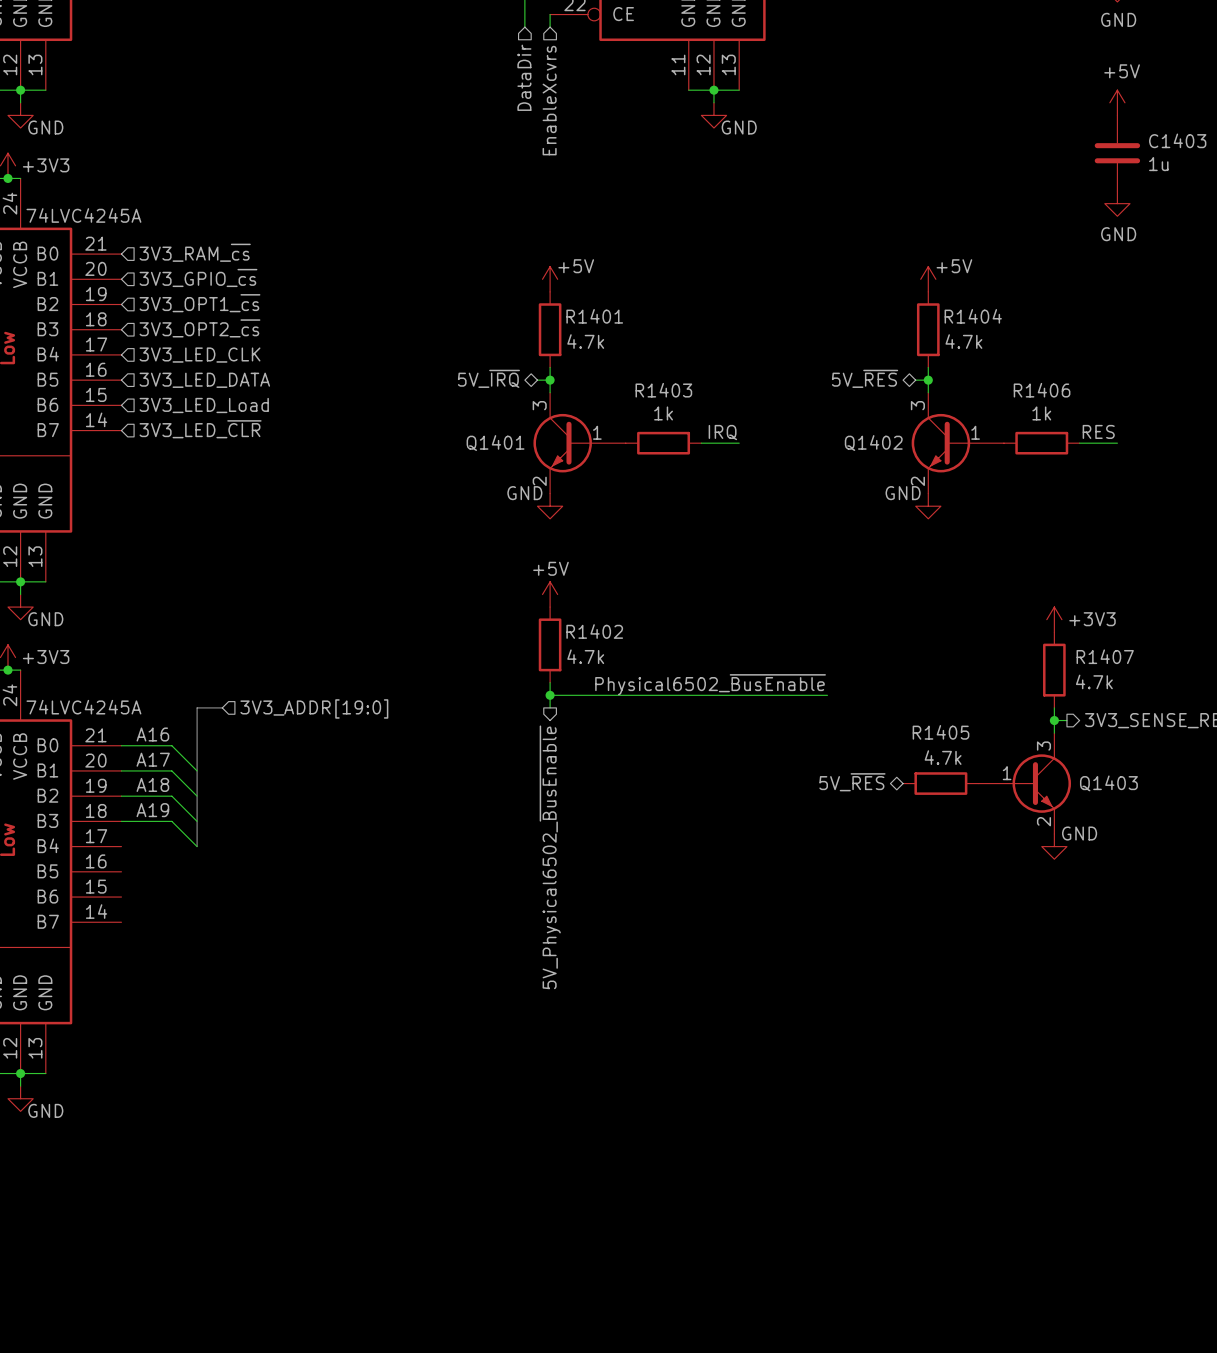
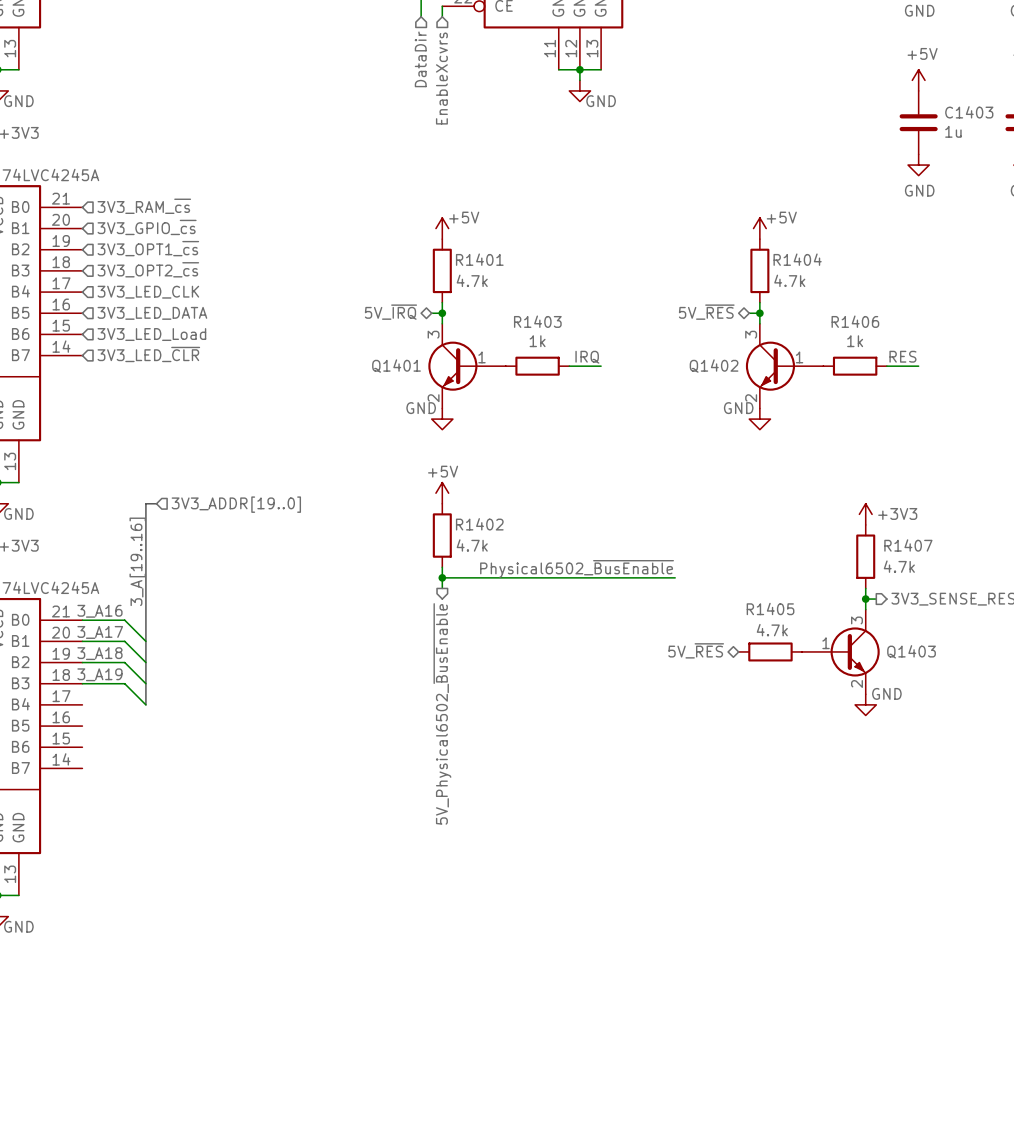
hierarchical label: none -> 3V3_ADDR[19..0] (236, 504)
label: none -> 3_A[19..16] (137, 561)
bus: (197, 707) (222, 707) -> (145, 588) (145, 503) (156, 503)
hierarchical label: 3V3_ADDR[19:0] (314, 708) -> none
label: A16 (152, 734) -> 3_A16 (99, 611)
label: A17 (153, 759) -> 3_A17 (100, 632)
label: A18 (152, 784) -> 3_A18 (99, 653)
label: A19 (152, 810) -> 3_A19 (99, 674)

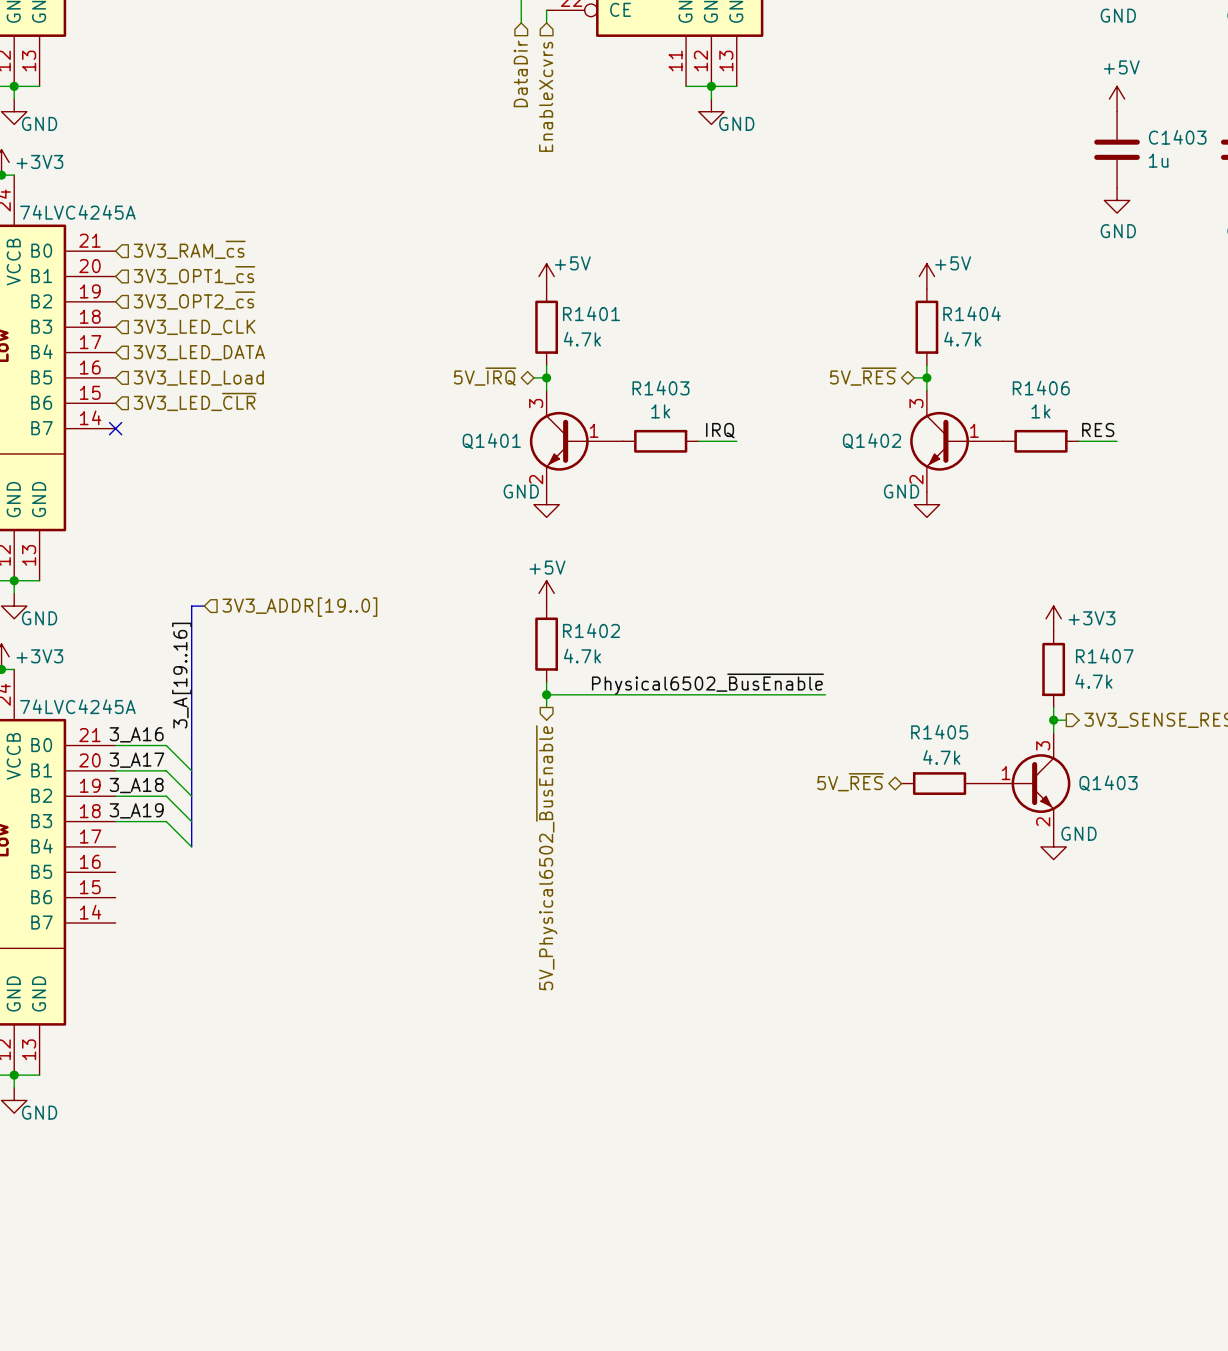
hierarchical label: 3V3_GPIO_~{cs} (147, 227) -> 3V3_OPT1_~{cs} (194, 275)
hierarchical label: 3V3_OPT1_~{cs} (148, 248) -> 3V3_OPT2_~{cs} (194, 300)
hierarchical label: 3V3_OPT2_~{cs} (148, 269) -> 3V3_LED_CLK (194, 327)
hierarchical label: 3V3_LED_CLK (148, 292) -> 3V3_LED_DATA (199, 352)
hierarchical label: 3V3_LED_DATA (152, 313) -> 3V3_LED_Load (198, 378)
hierarchical label: 3V3_LED_Load (151, 334) -> 3V3_LED_~{CLR} (195, 401)
hierarchical label: 3V3_LED_~{CLR} (148, 354) -> none
no-connect mark: none -> (115, 428)

